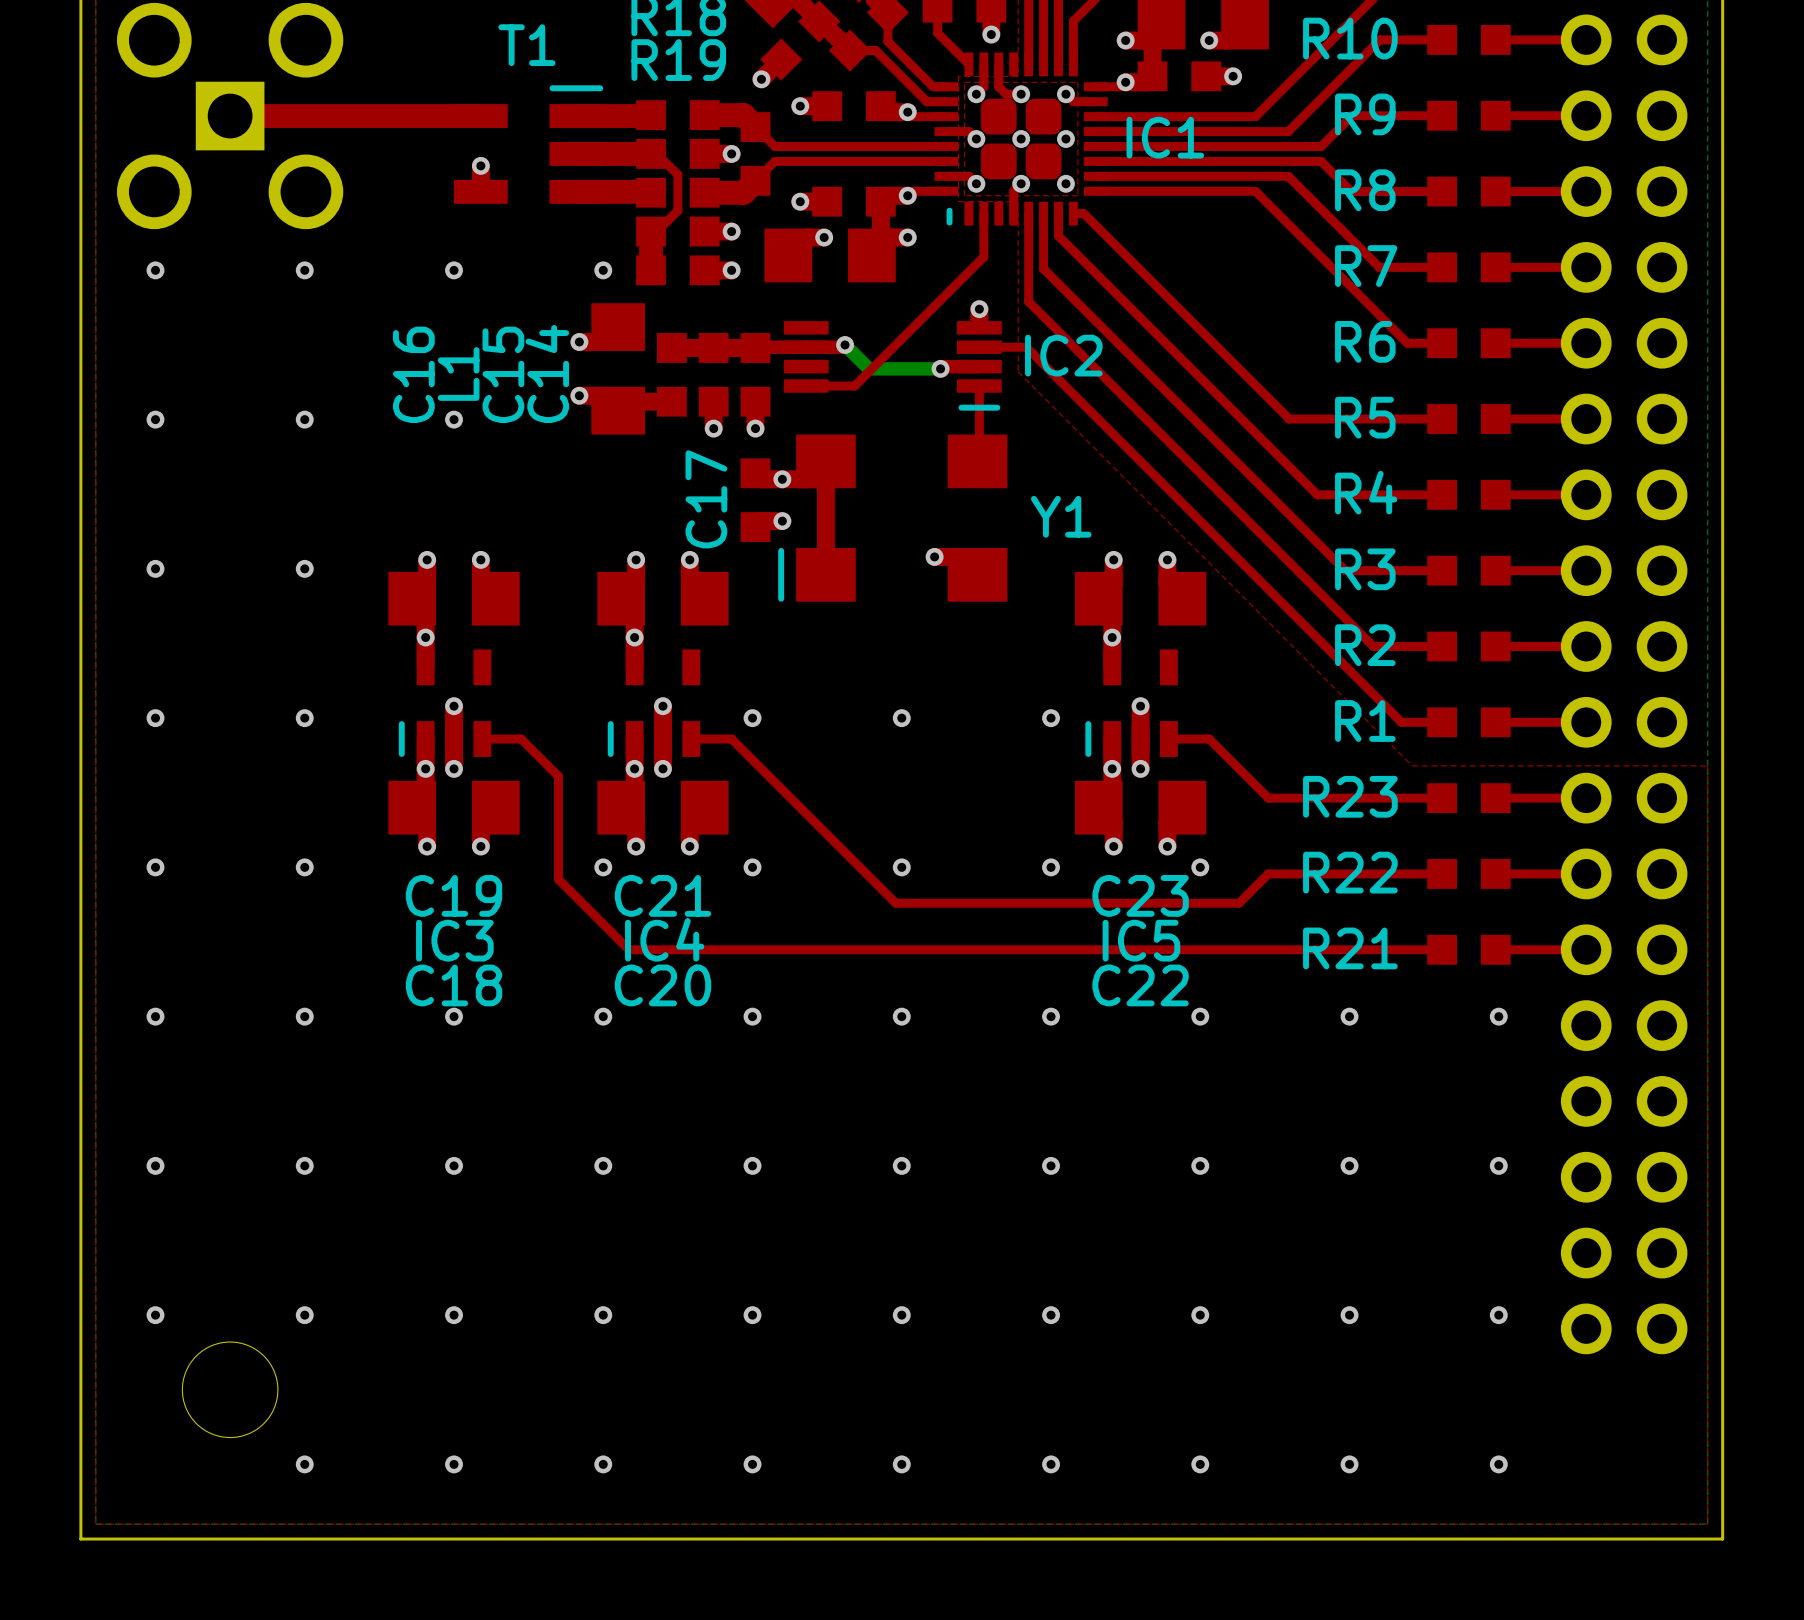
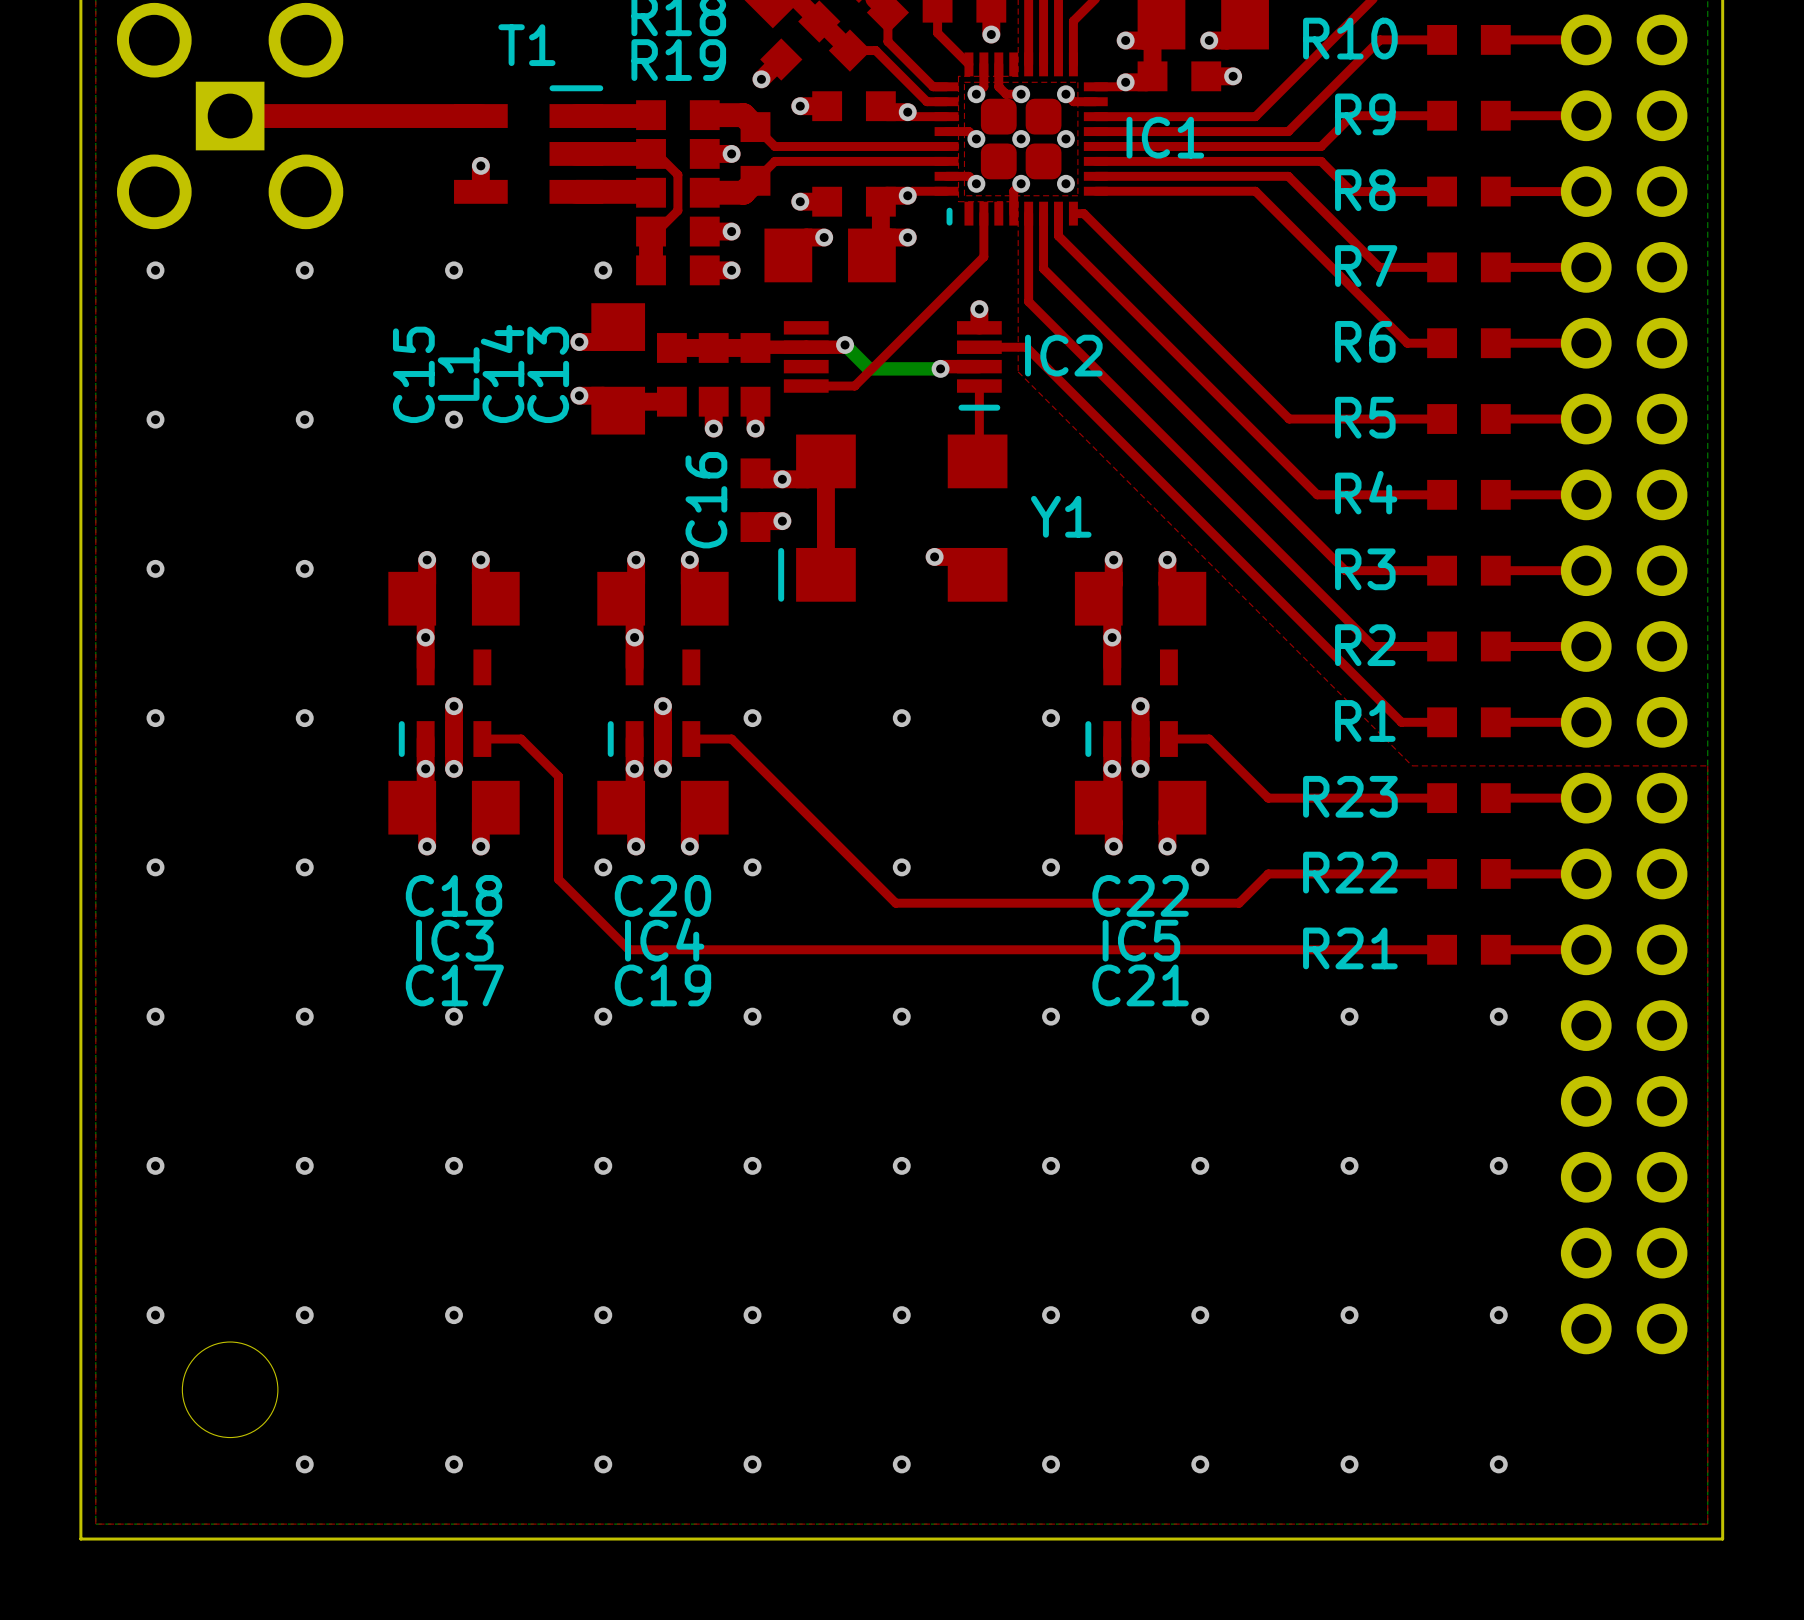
C14 name: C14 (547, 373) -> C13 (548, 374)
C16 name: C16 (413, 374) -> C15 (413, 374)
C15 name: C15 (503, 374) -> C14 (502, 373)
C17 name: C17 (706, 499) -> C16 (706, 500)
C19 name: C19 (454, 895) -> C18 (454, 895)
C21 name: C21 (662, 895) -> C20 (662, 895)
C23 name: C23 (1140, 895) -> C22 (1140, 895)
C18 name: C18 (454, 985) -> C17 (454, 985)
C20 name: C20 (662, 985) -> C19 (662, 985)
C22 name: C22 (1140, 985) -> C21 (1140, 985)

